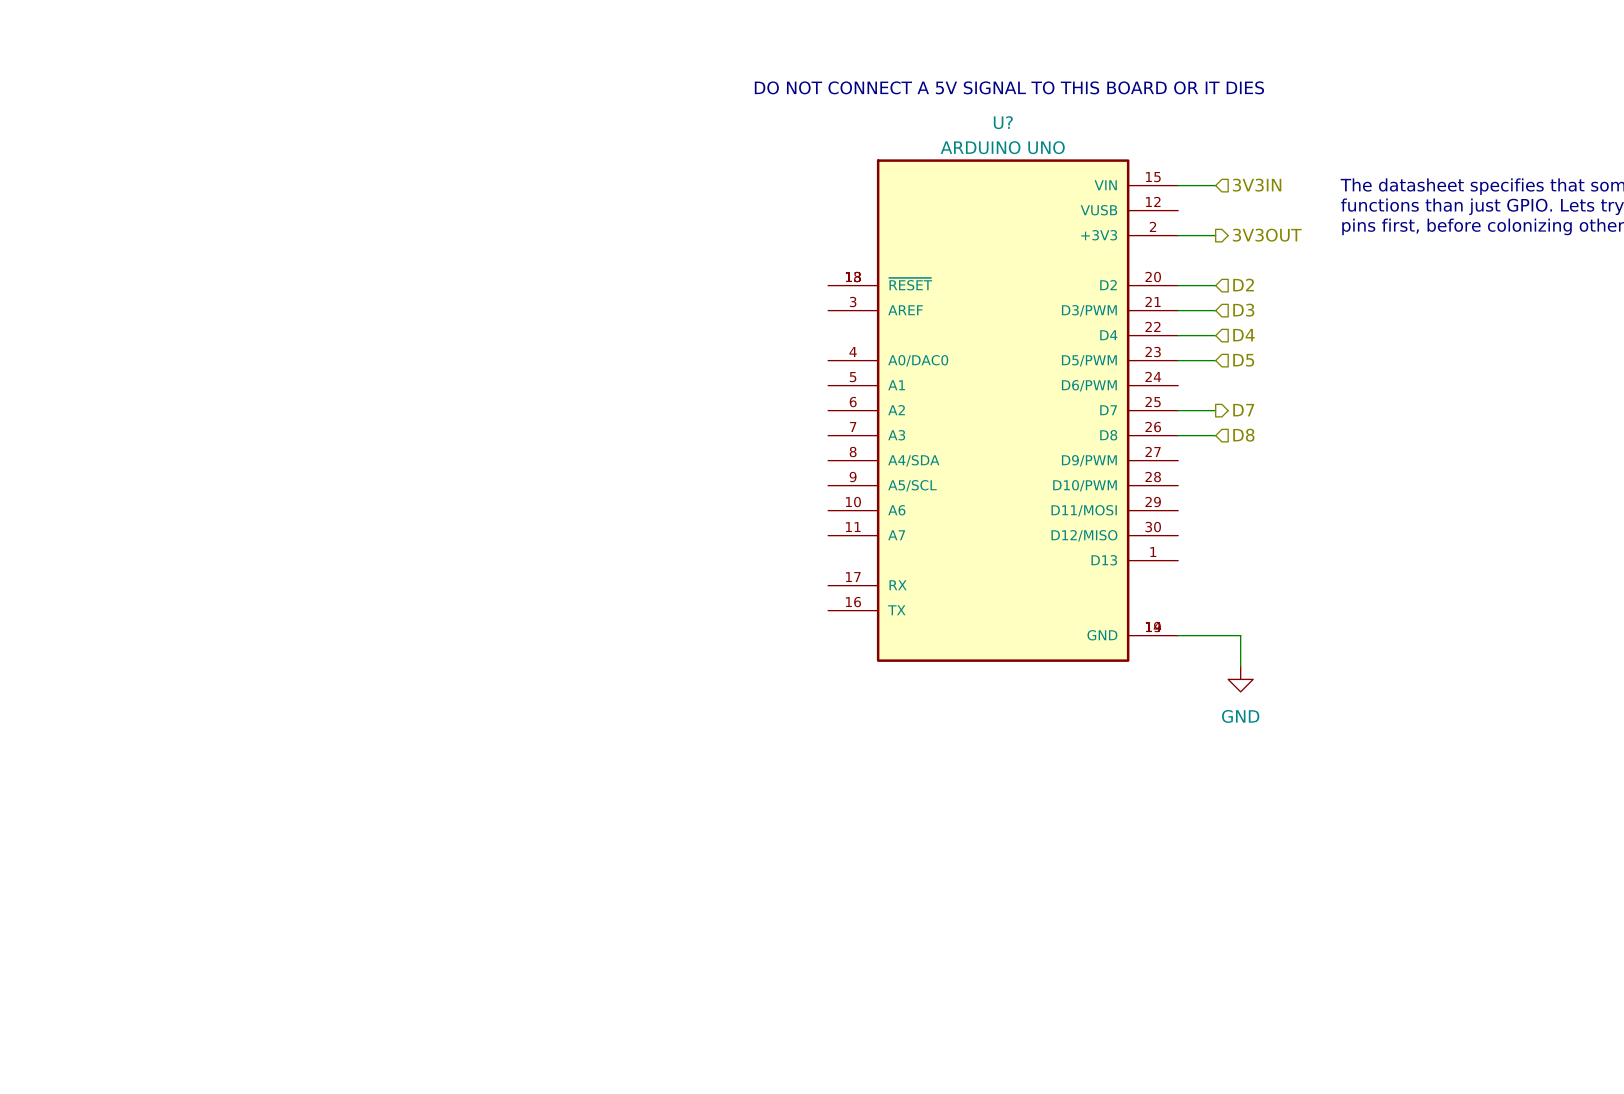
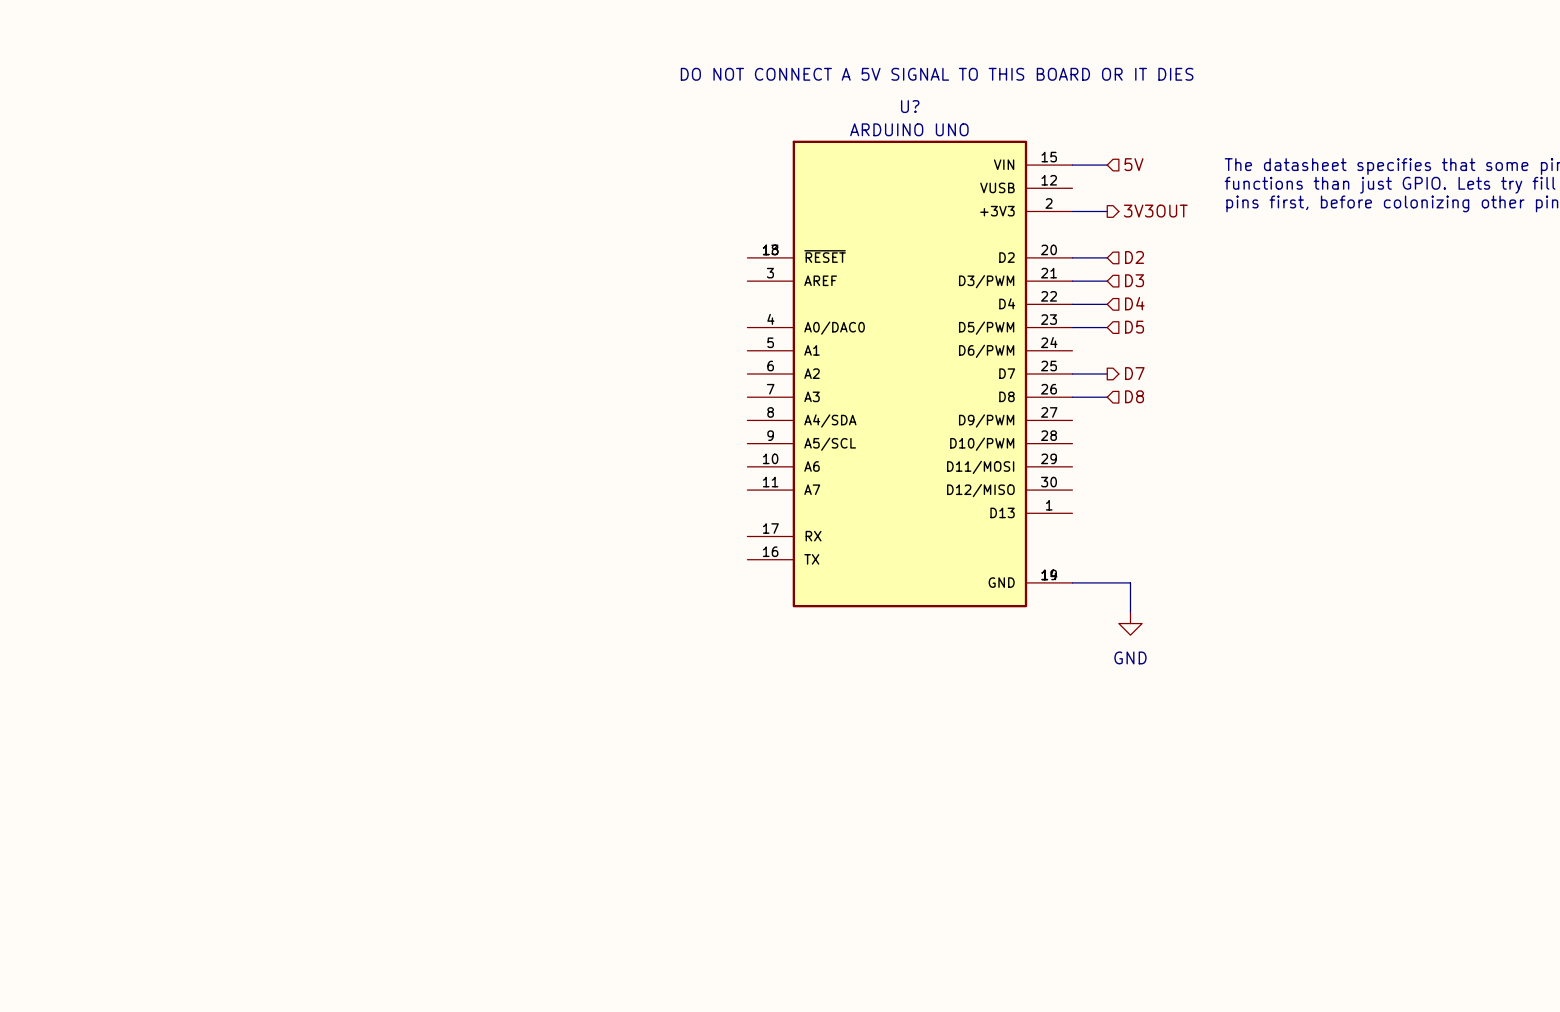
hierarchical label: 3V3IN (1257, 185) -> 5V (1133, 164)

